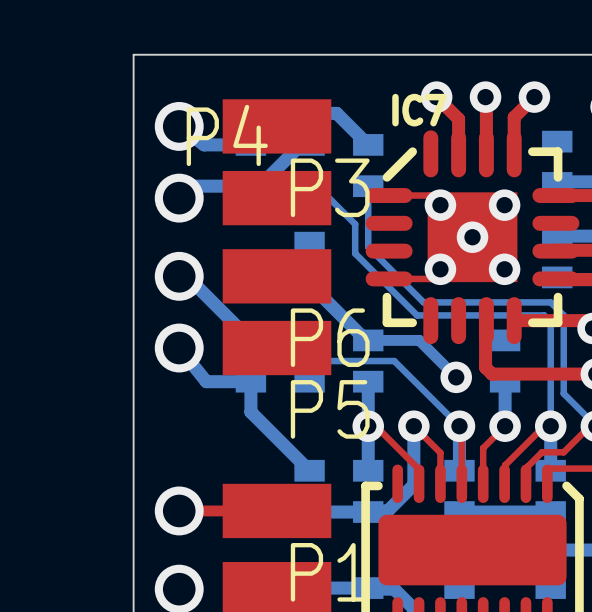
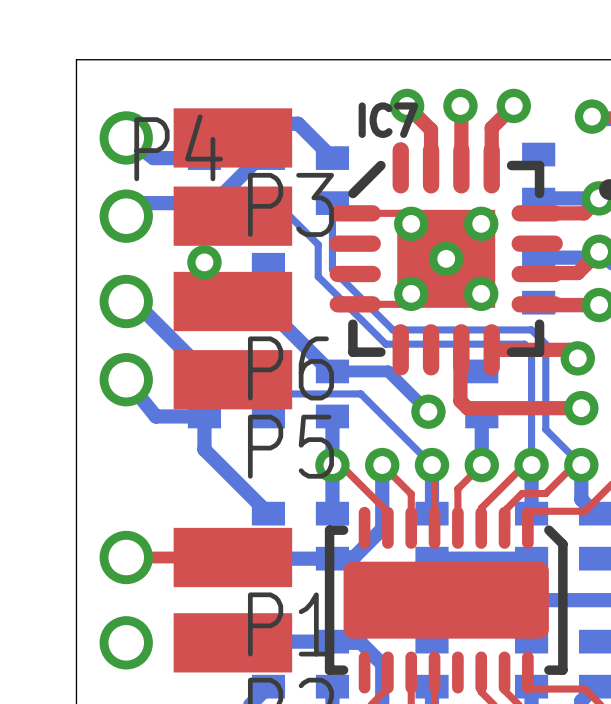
via: none -> (204, 262)

